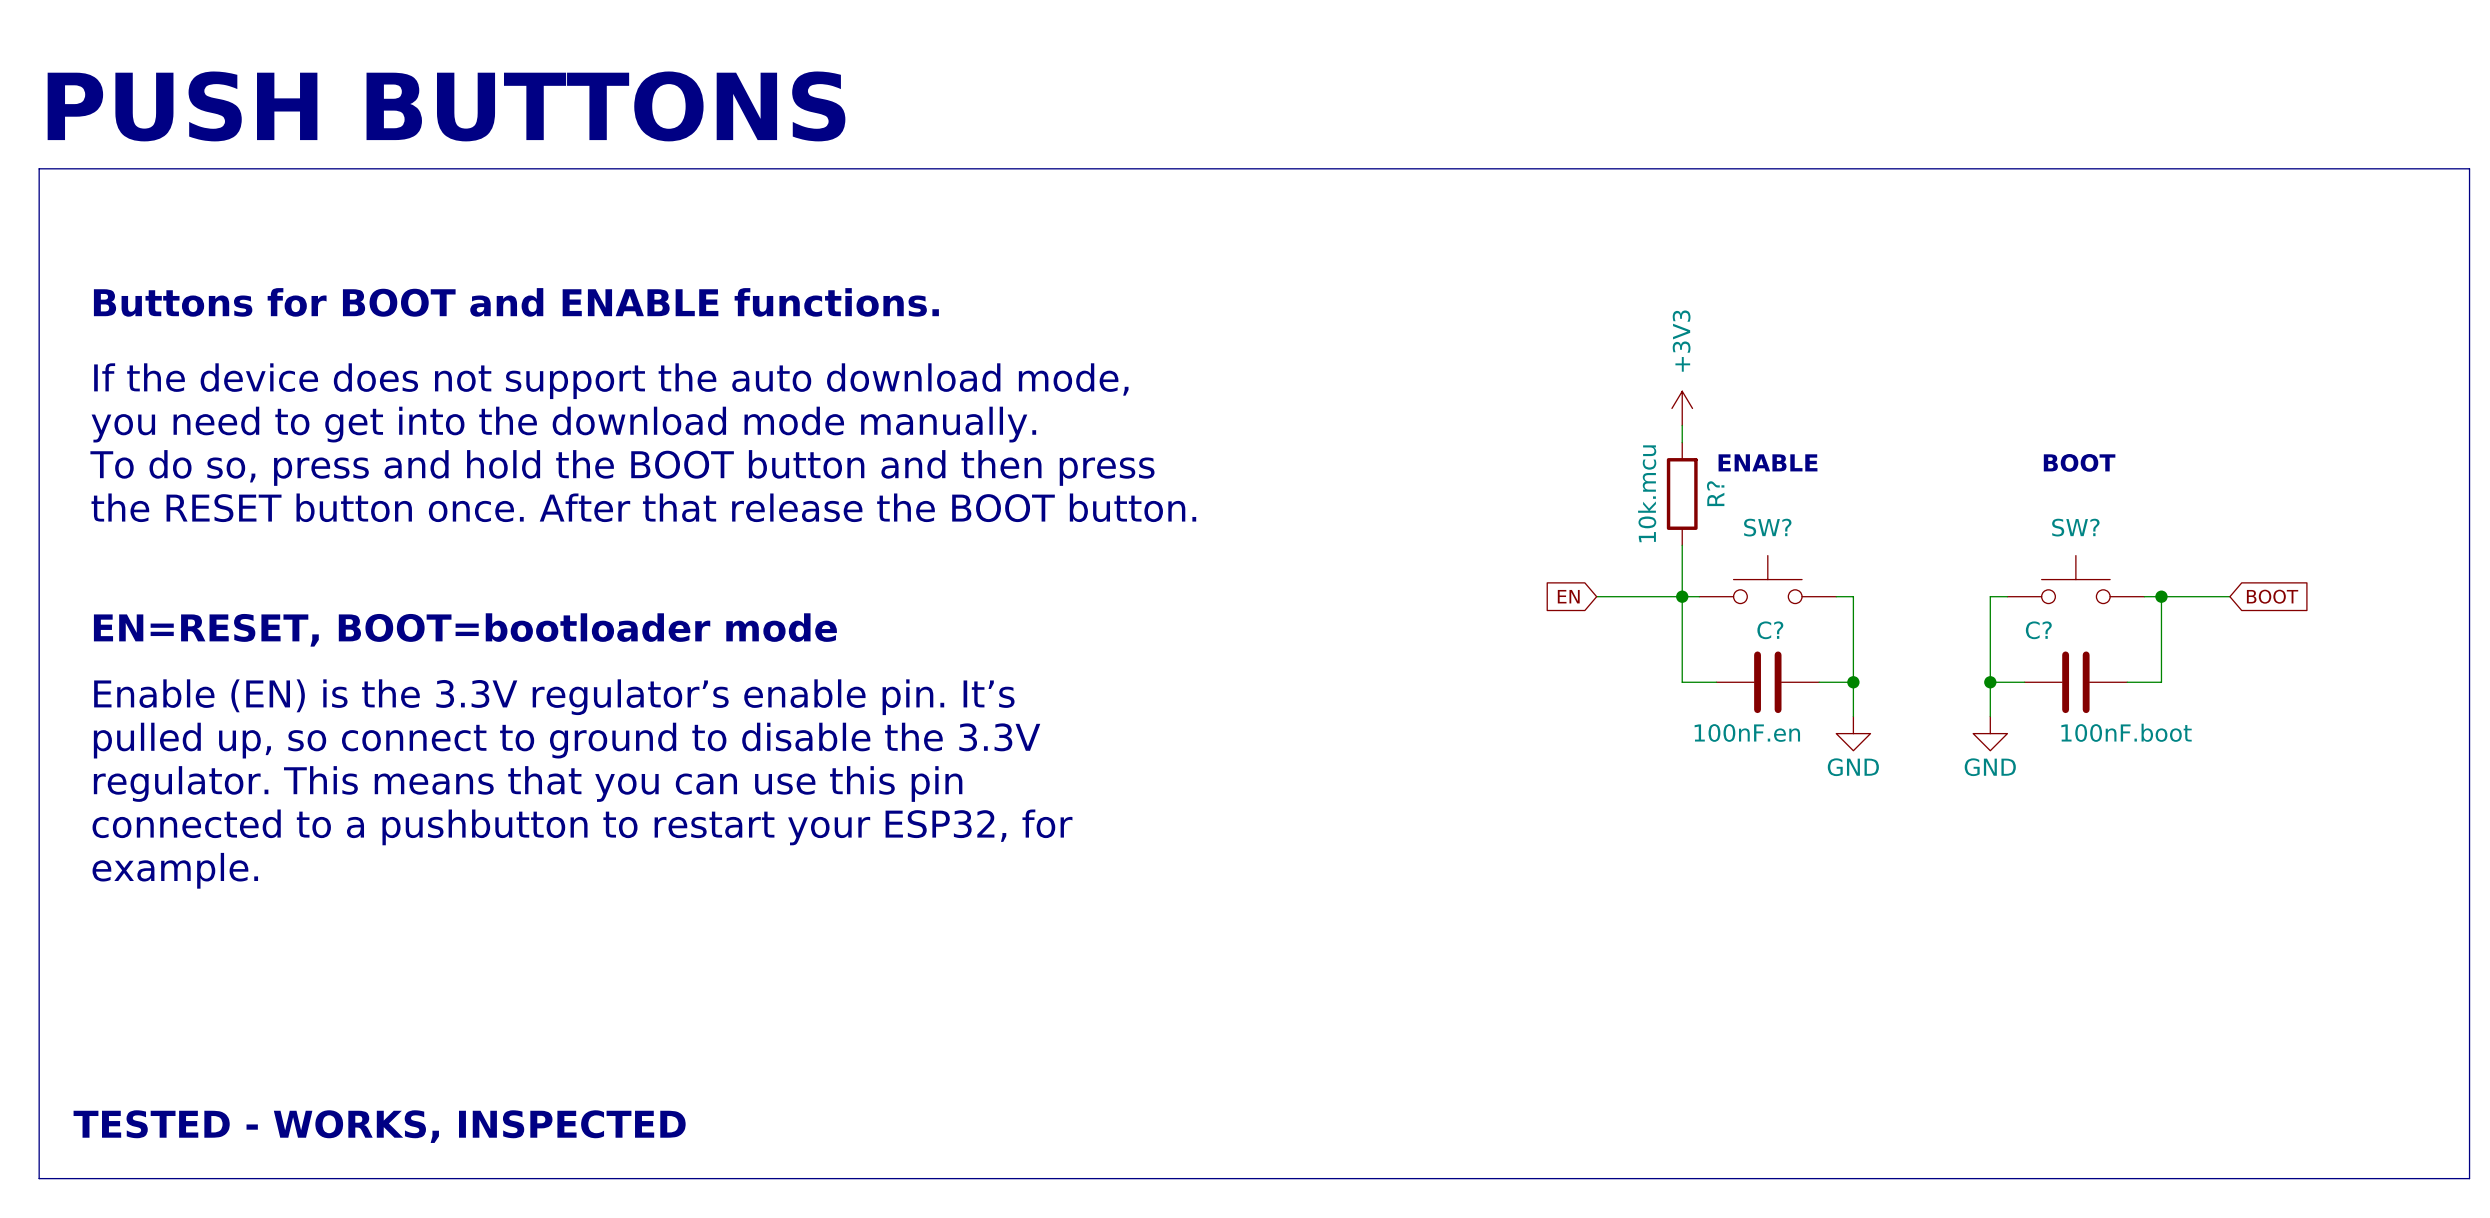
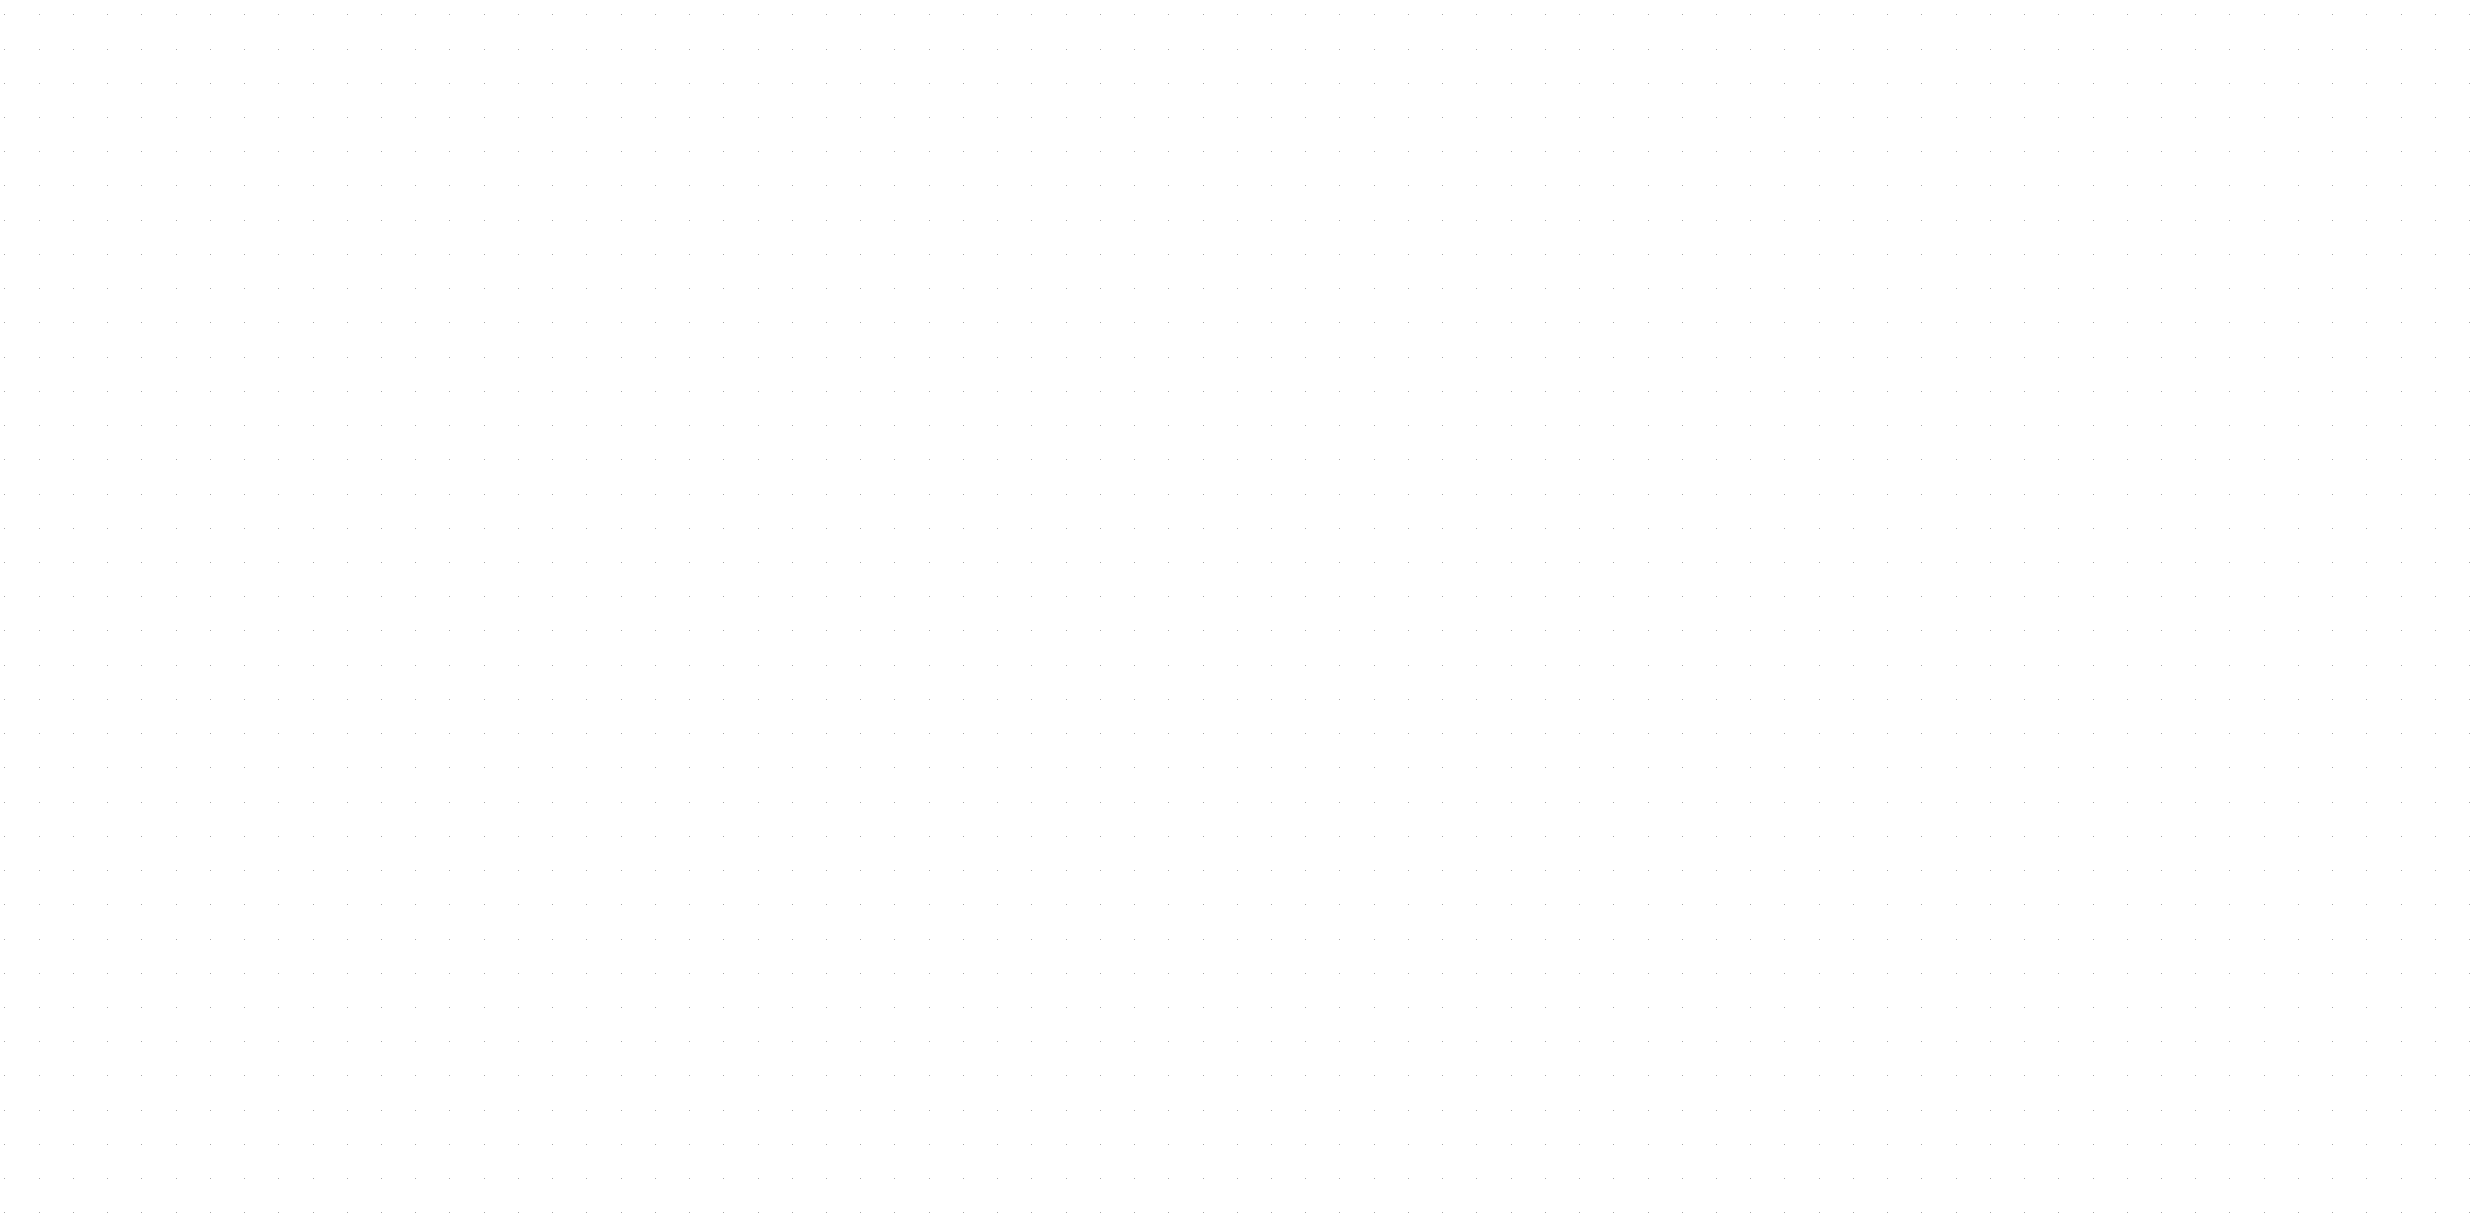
text: PUSH BUTTONS (446, 106) -> none
line: (39, 168) (2469, 168) (2469, 1178) (39, 1178) (39, 168) -> none
text: Buttons for BOOT and ENABLE functions. (516, 302) -> none
text: If the device does not support the auto download mode, (611, 381) -> none
power symbol: +3V3 (1682, 408) -> none
text: you need to get into the download mode manually. (563, 424) -> none
wire: (1682, 425) (1682, 442) -> none
text: ENABLE (1768, 462) -> none
text: BOOT (2079, 462) -> none
text: To do so, press and hold the BOOT button and then press (622, 467) -> none
R?: 10k.mcu (1682, 494) -> none
text: the RESET button once. After that release the BOOT button. (643, 507) -> none
wire: (1682, 545) (1682, 682) (1716, 682) -> none
SW?: (1767, 579) -> none
SW?: (2075, 579) -> none
global label: EN (1568, 596) -> none
wire: (1596, 596) (1699, 596) -> none
junction: (1682, 596) -> none
wire: (1836, 596) (1853, 596) (1853, 716) -> none
wire: (2007, 596) (1990, 596) (1990, 716) -> none
wire: (2144, 596) (2229, 596) -> none
wire: (2161, 596) (2161, 682) (2127, 682) -> none
junction: (2161, 596) -> none
global label: BOOT (2272, 596) -> none
text: EN=RESET, BOOT=bootloader mode (465, 629) -> none
C?: 100nF.en (1767, 682) -> none
wire: (1819, 682) (1853, 682) -> none
junction: (1853, 682) -> none
wire: (1990, 682) (2024, 682) -> none
junction: (1990, 682) -> none
C?: 100nF.boot (2075, 682) -> none
text: Enable (EN) is the 3.3V regulator’s enable pin. It’s (554, 697) -> none
power symbol: GND (1853, 733) -> none
power symbol: GND (1990, 733) -> none
text: pulled up, so connect to ground to disable the 3.3V (567, 740) -> none
text: regulator. This means that you can use this pin (528, 783) -> none
text: connected to a pushbutton to restart your ESP32, for (582, 827) -> none
text: example. (175, 870) -> none
text: TESTED - WORKS, INSPECTED (379, 1126) -> none

